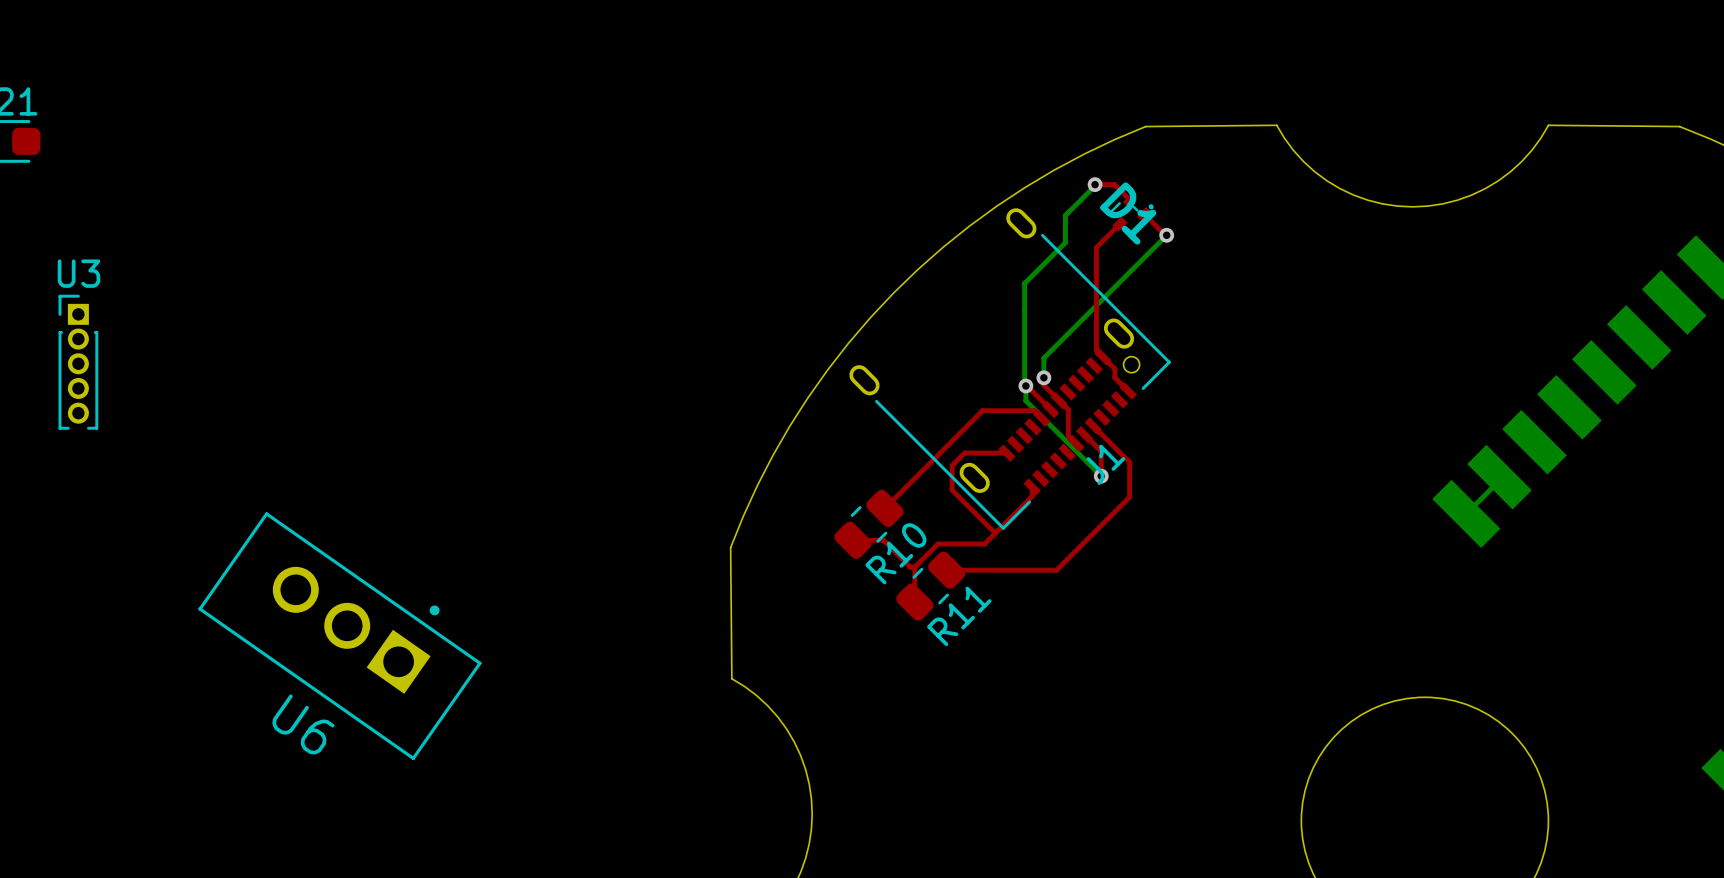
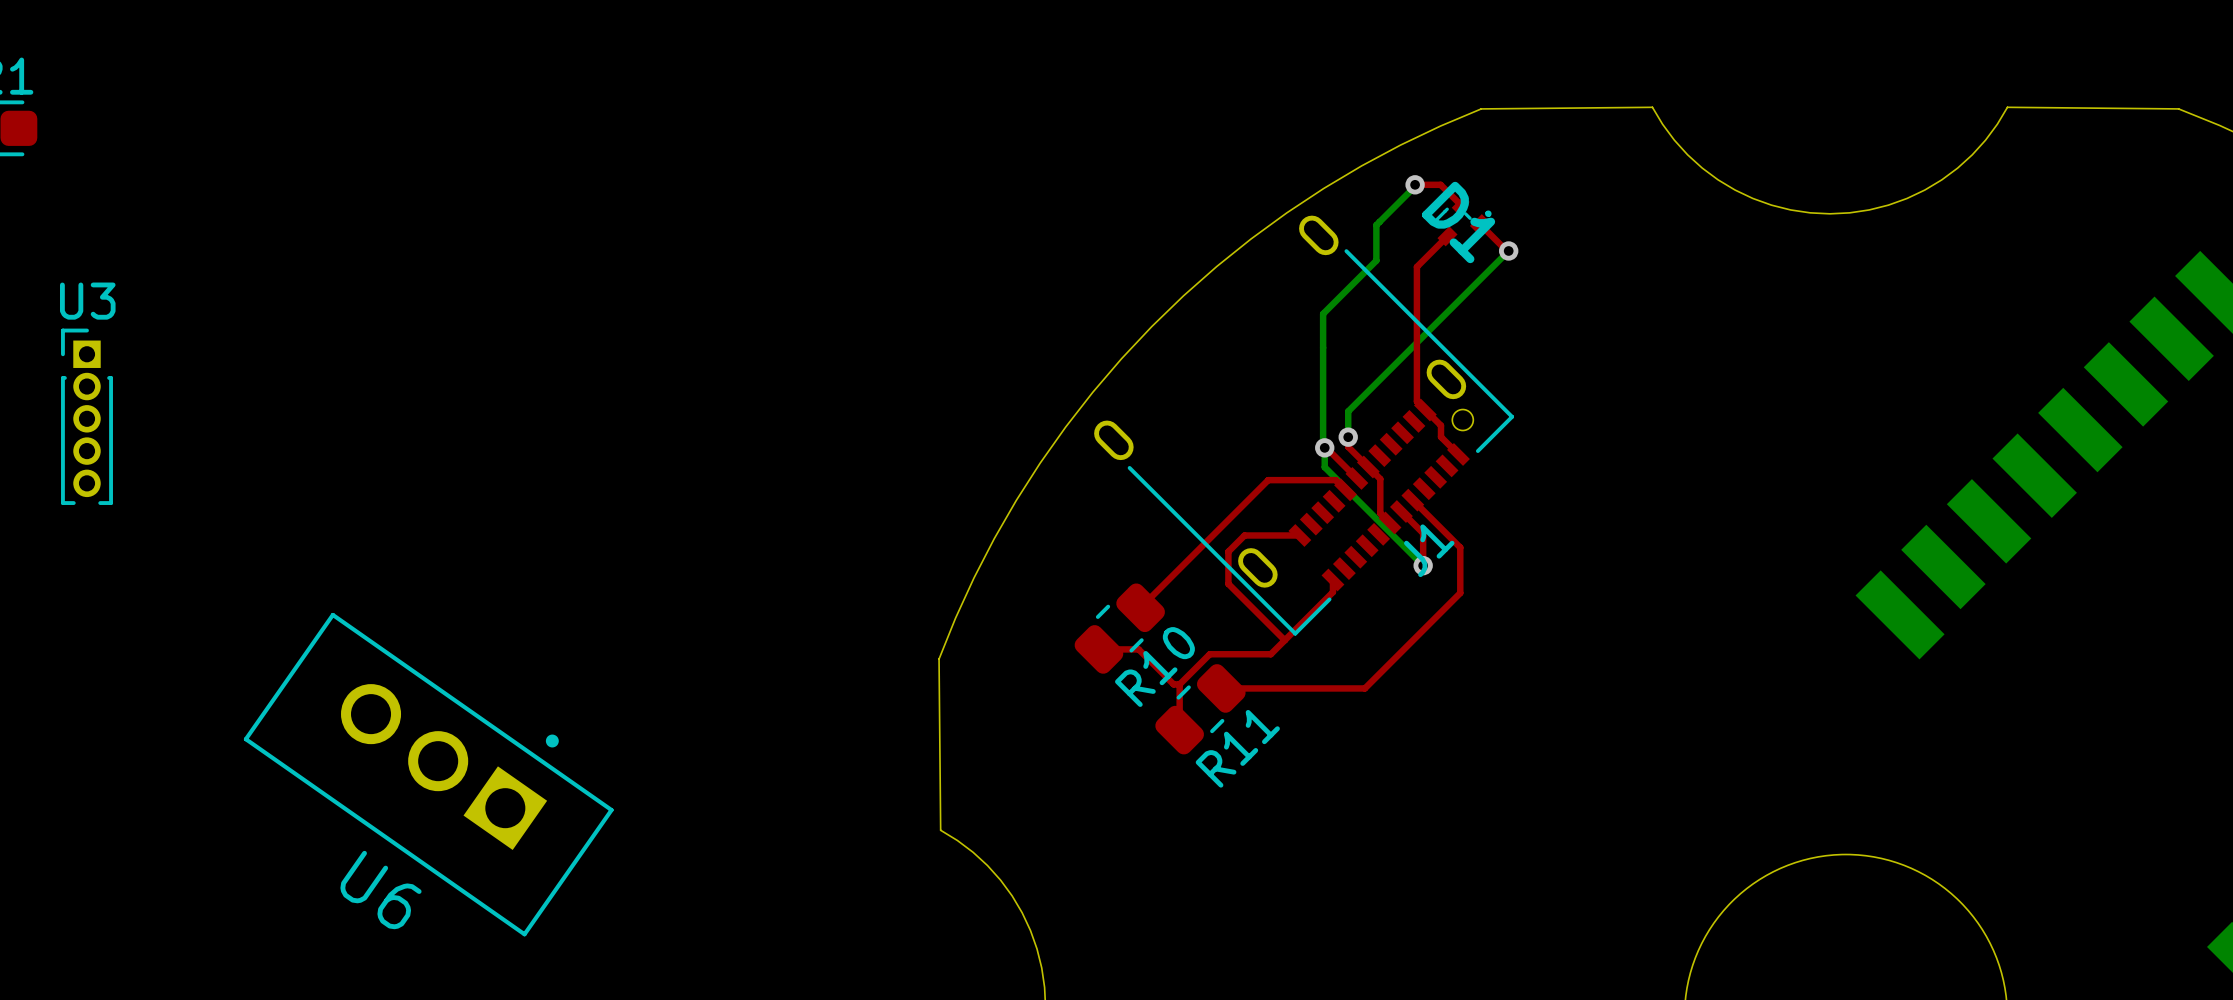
bottom track: (1499, 477) (1499, 480) (1466, 513) -> none

